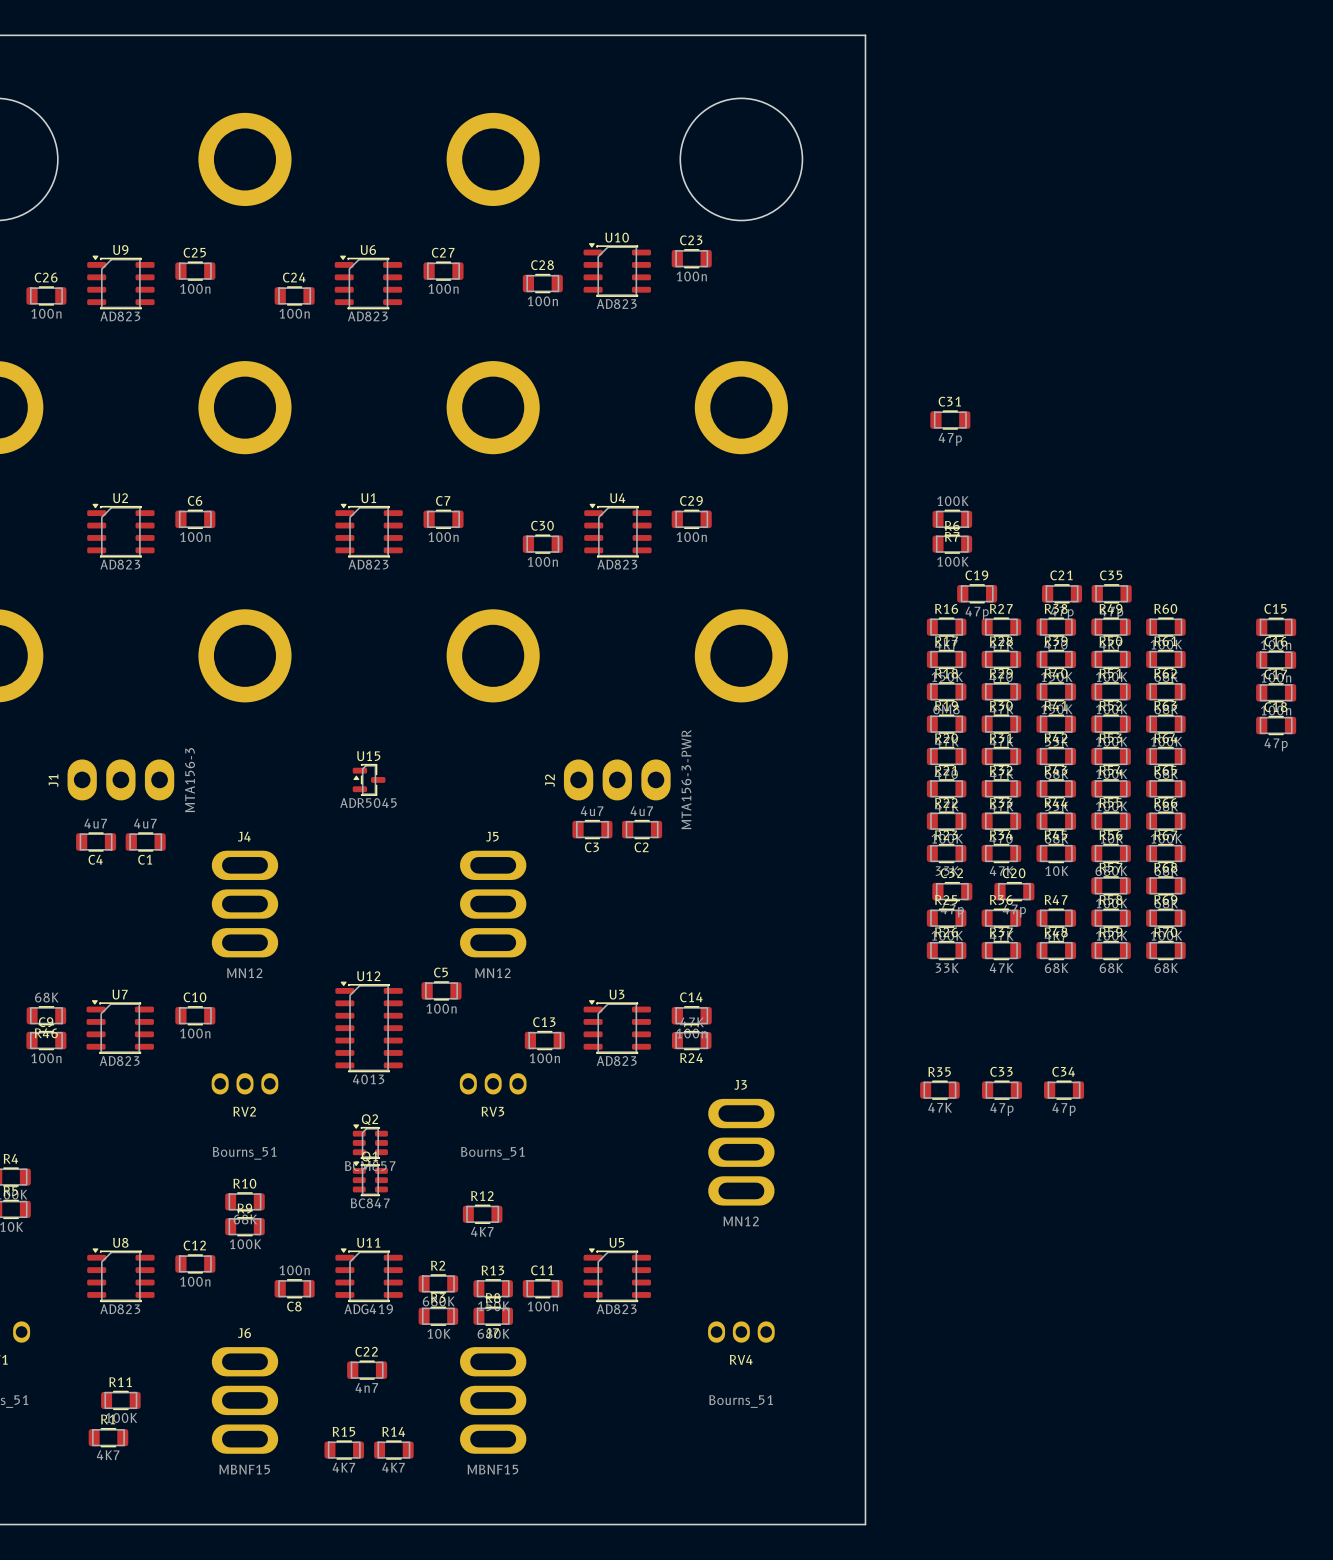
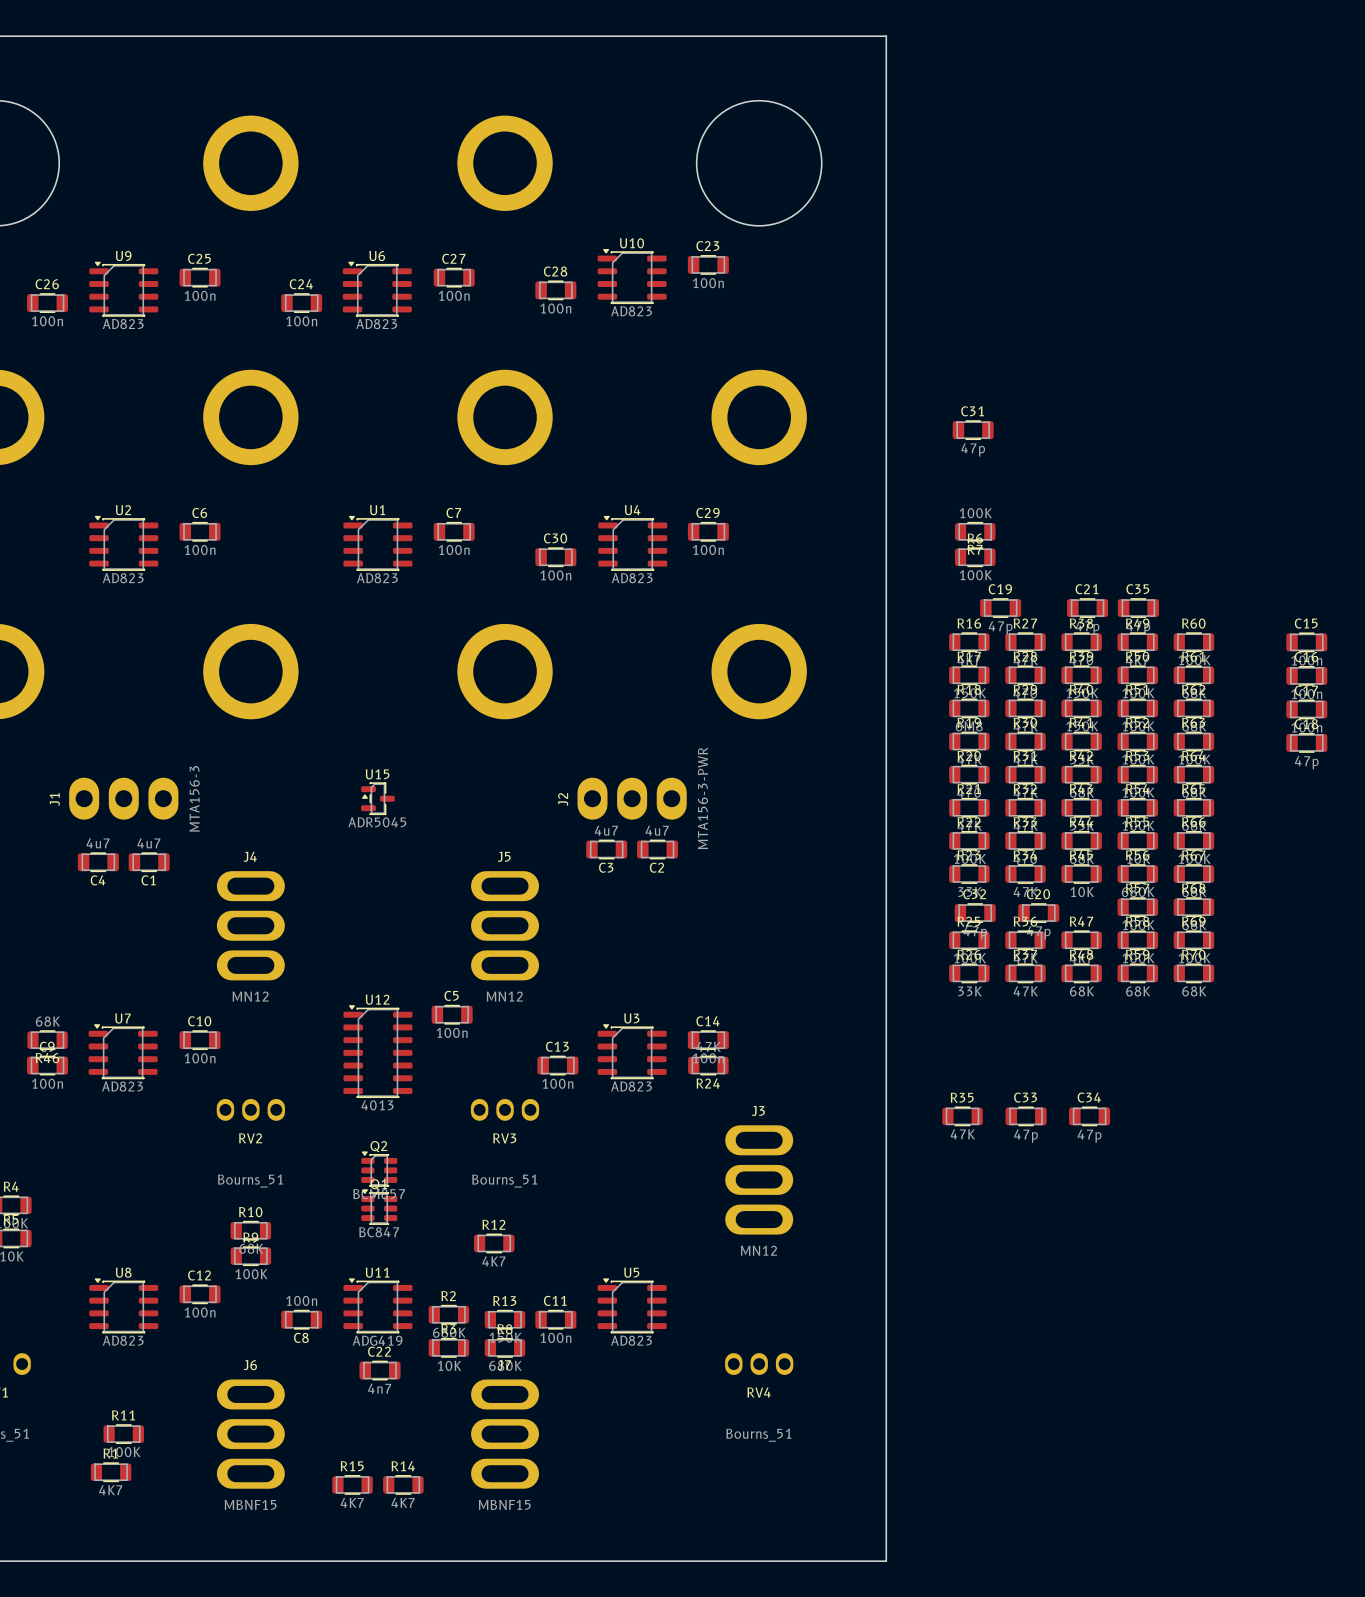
C22 position: (367, 1370) -> (380, 1370)

